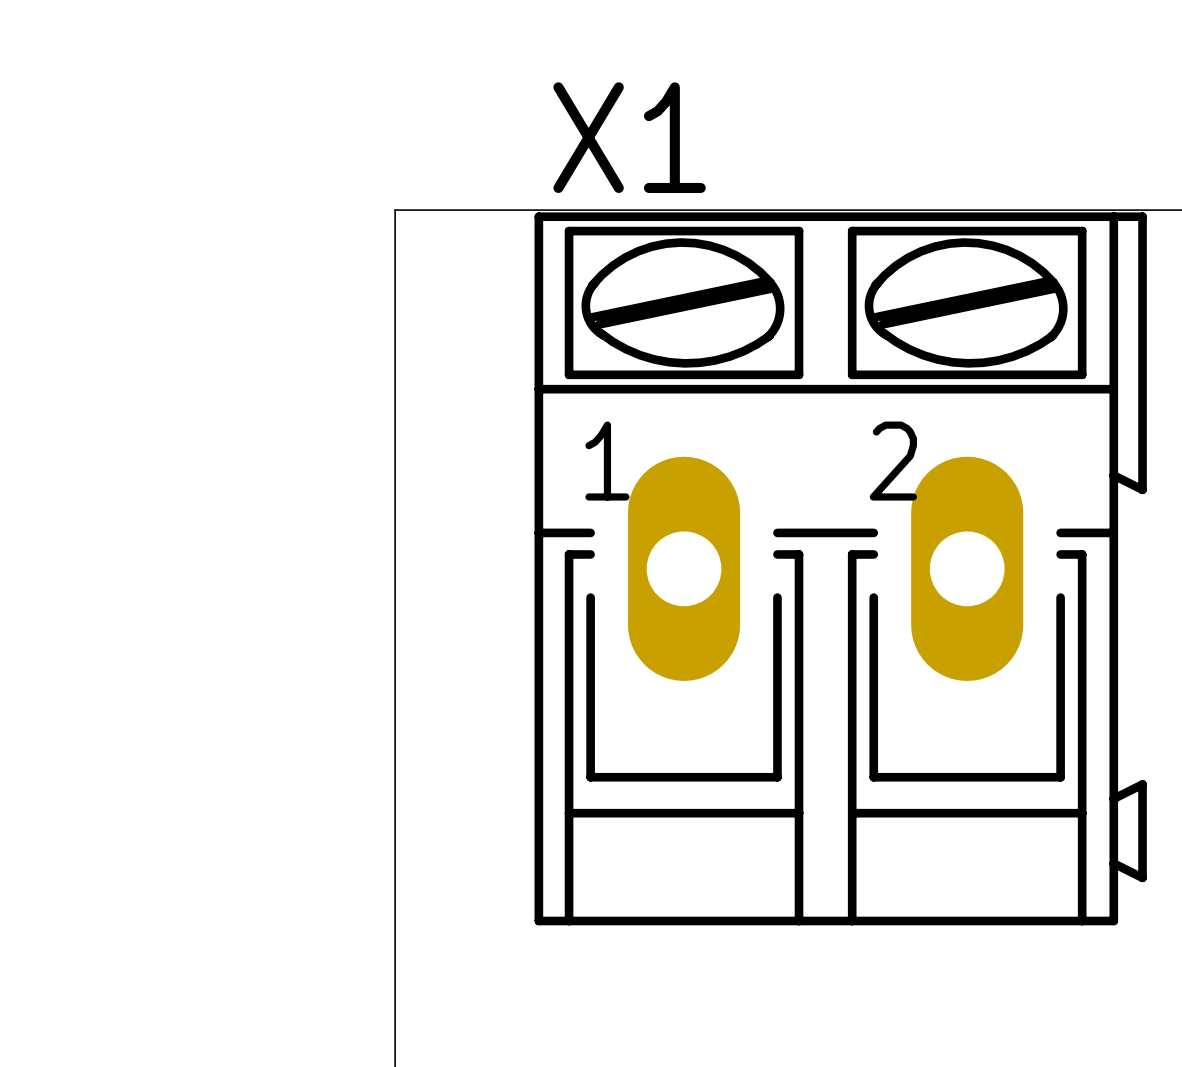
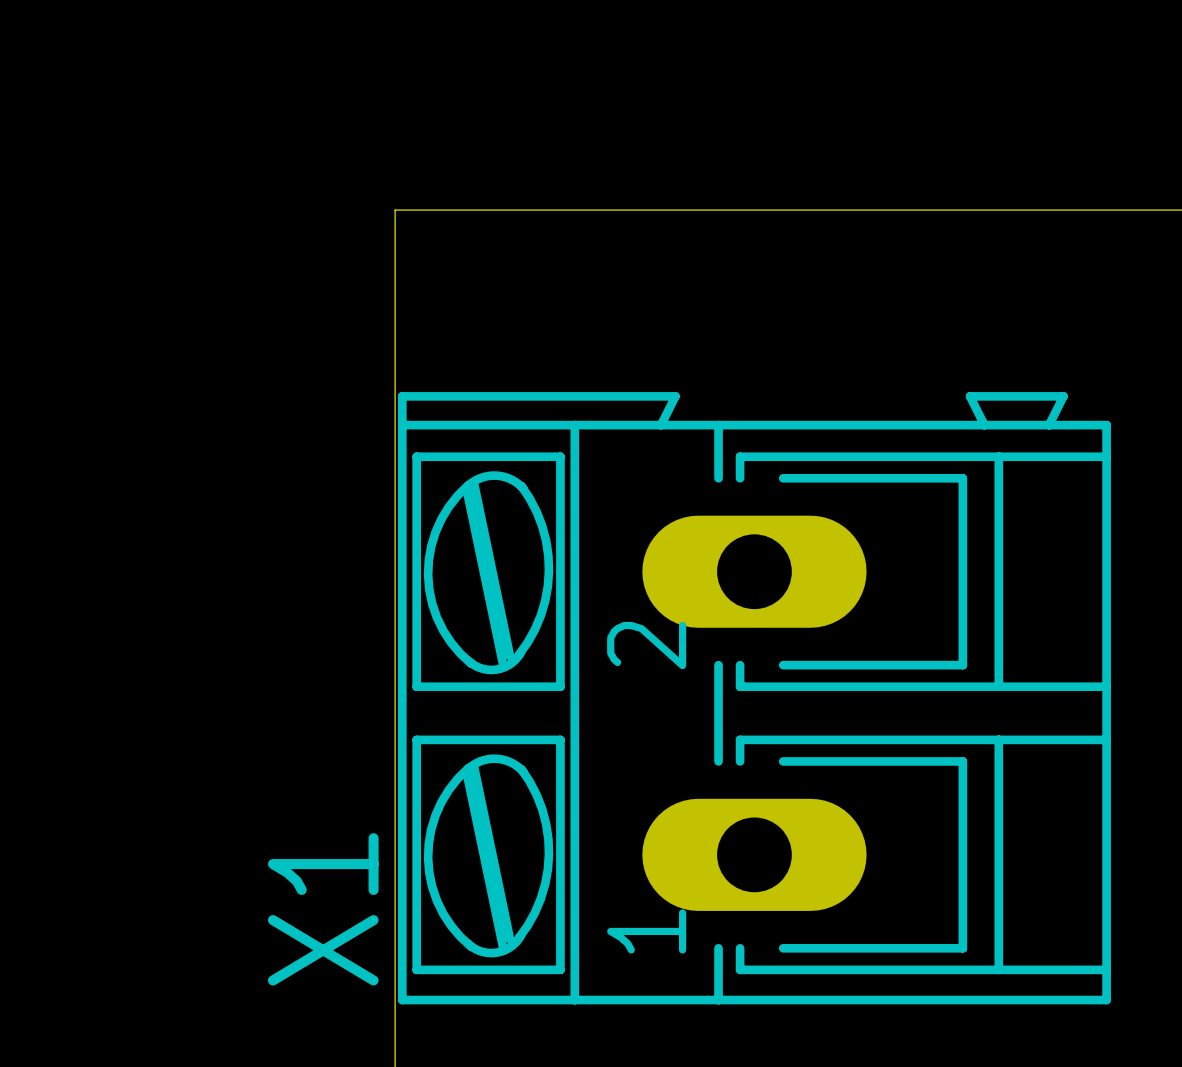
X1 rotation: 0° (840, 568) -> 90° counterclockwise (754, 698)

